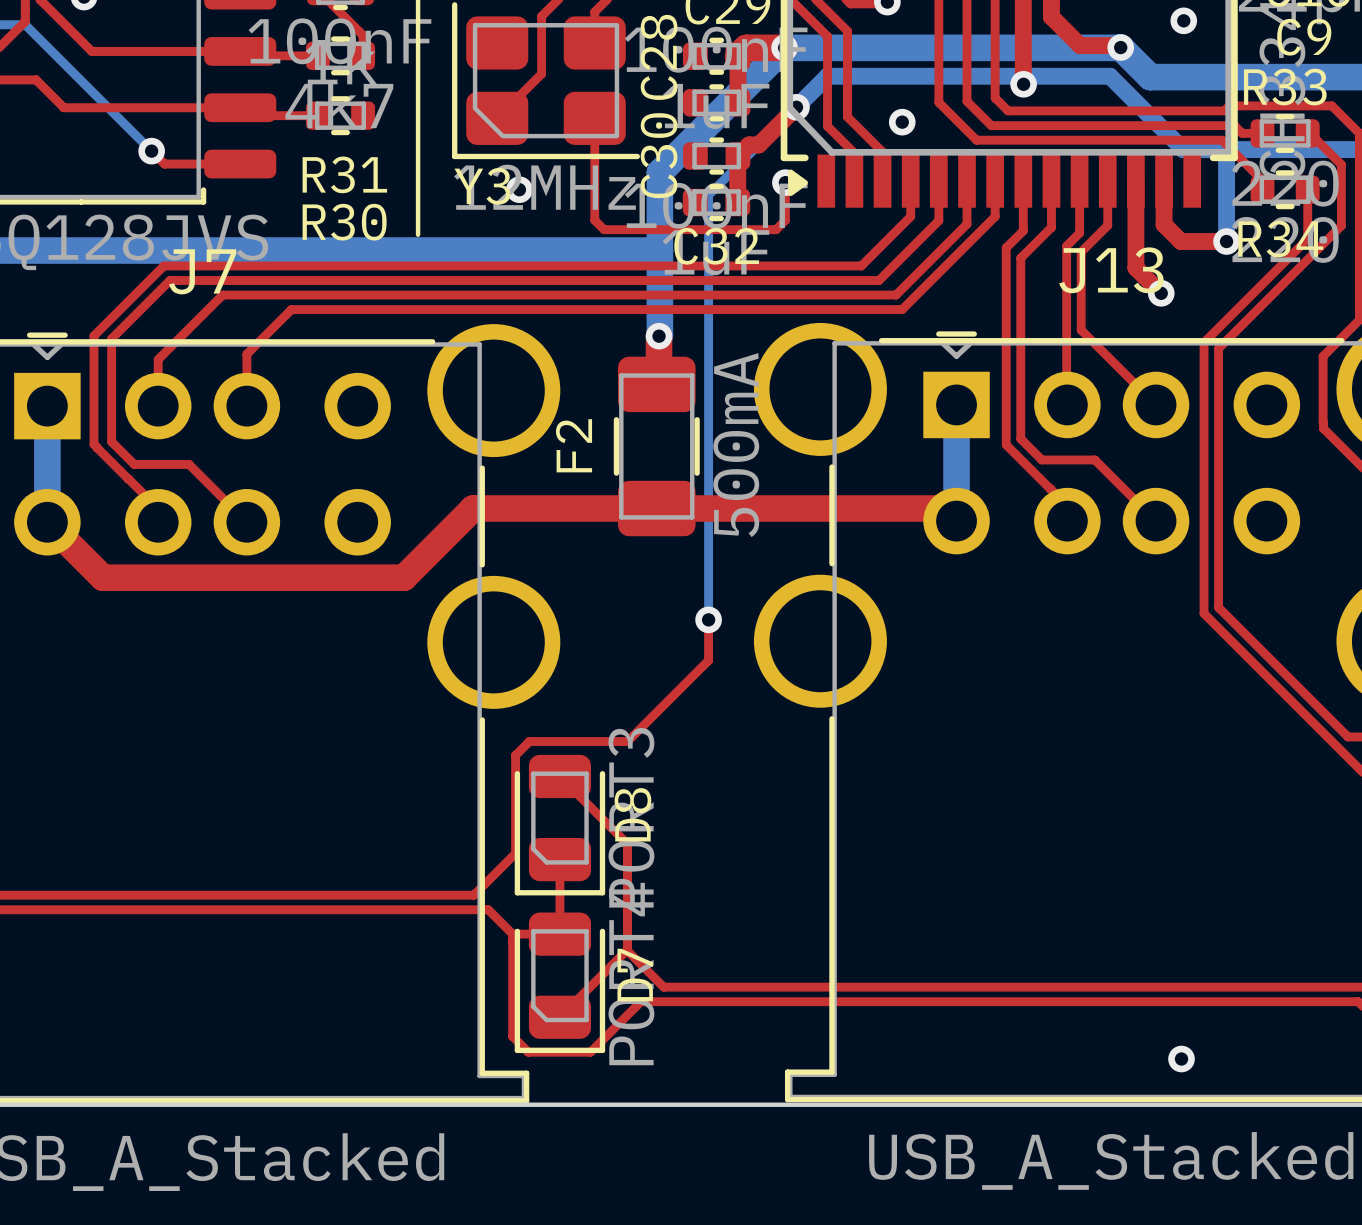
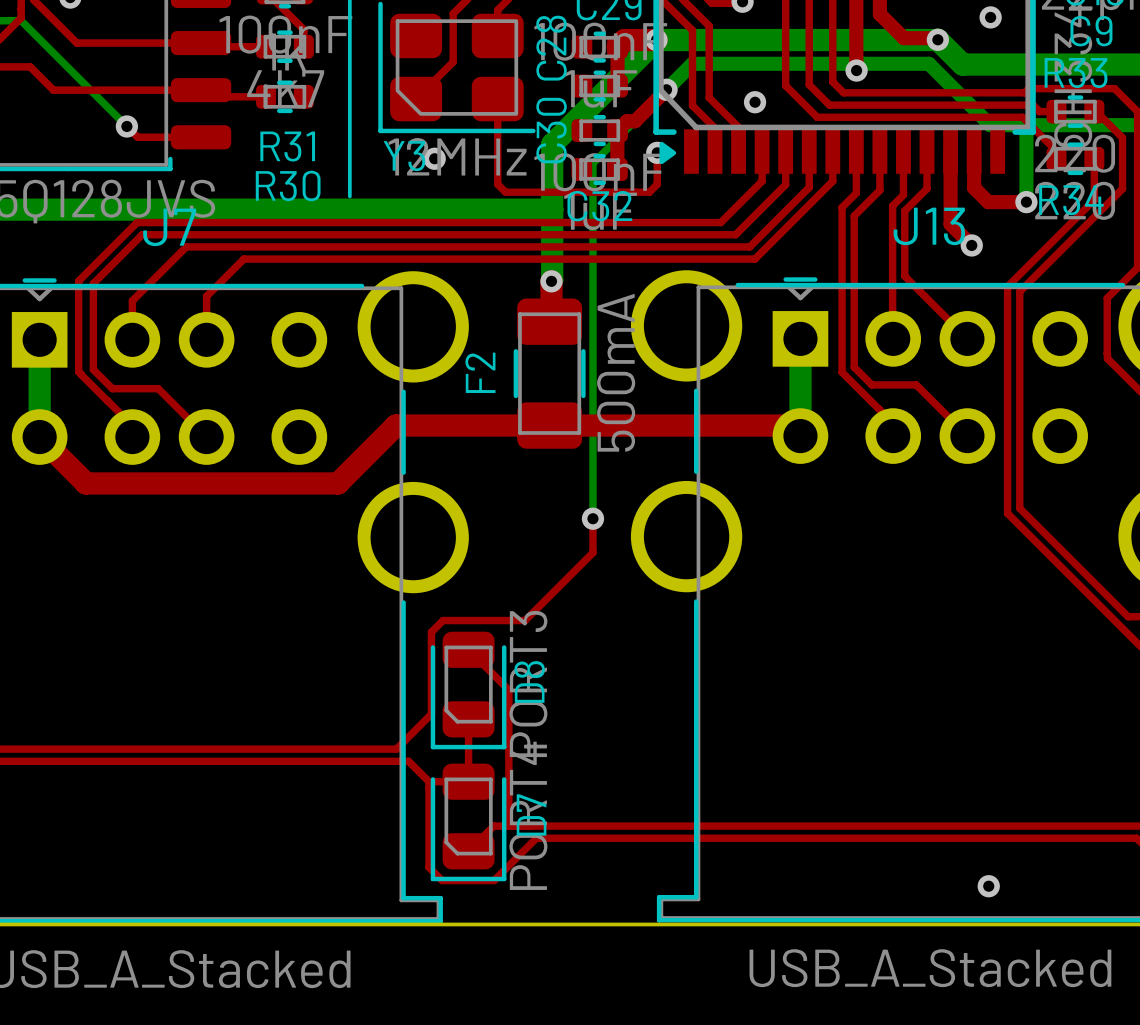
top track: (608, 824) (627, 844) (627, 950) (663, 987) -> (508, 690) (508, 826)
top track: (627, 949) (590, 987) -> (555, 826) (493, 826)

